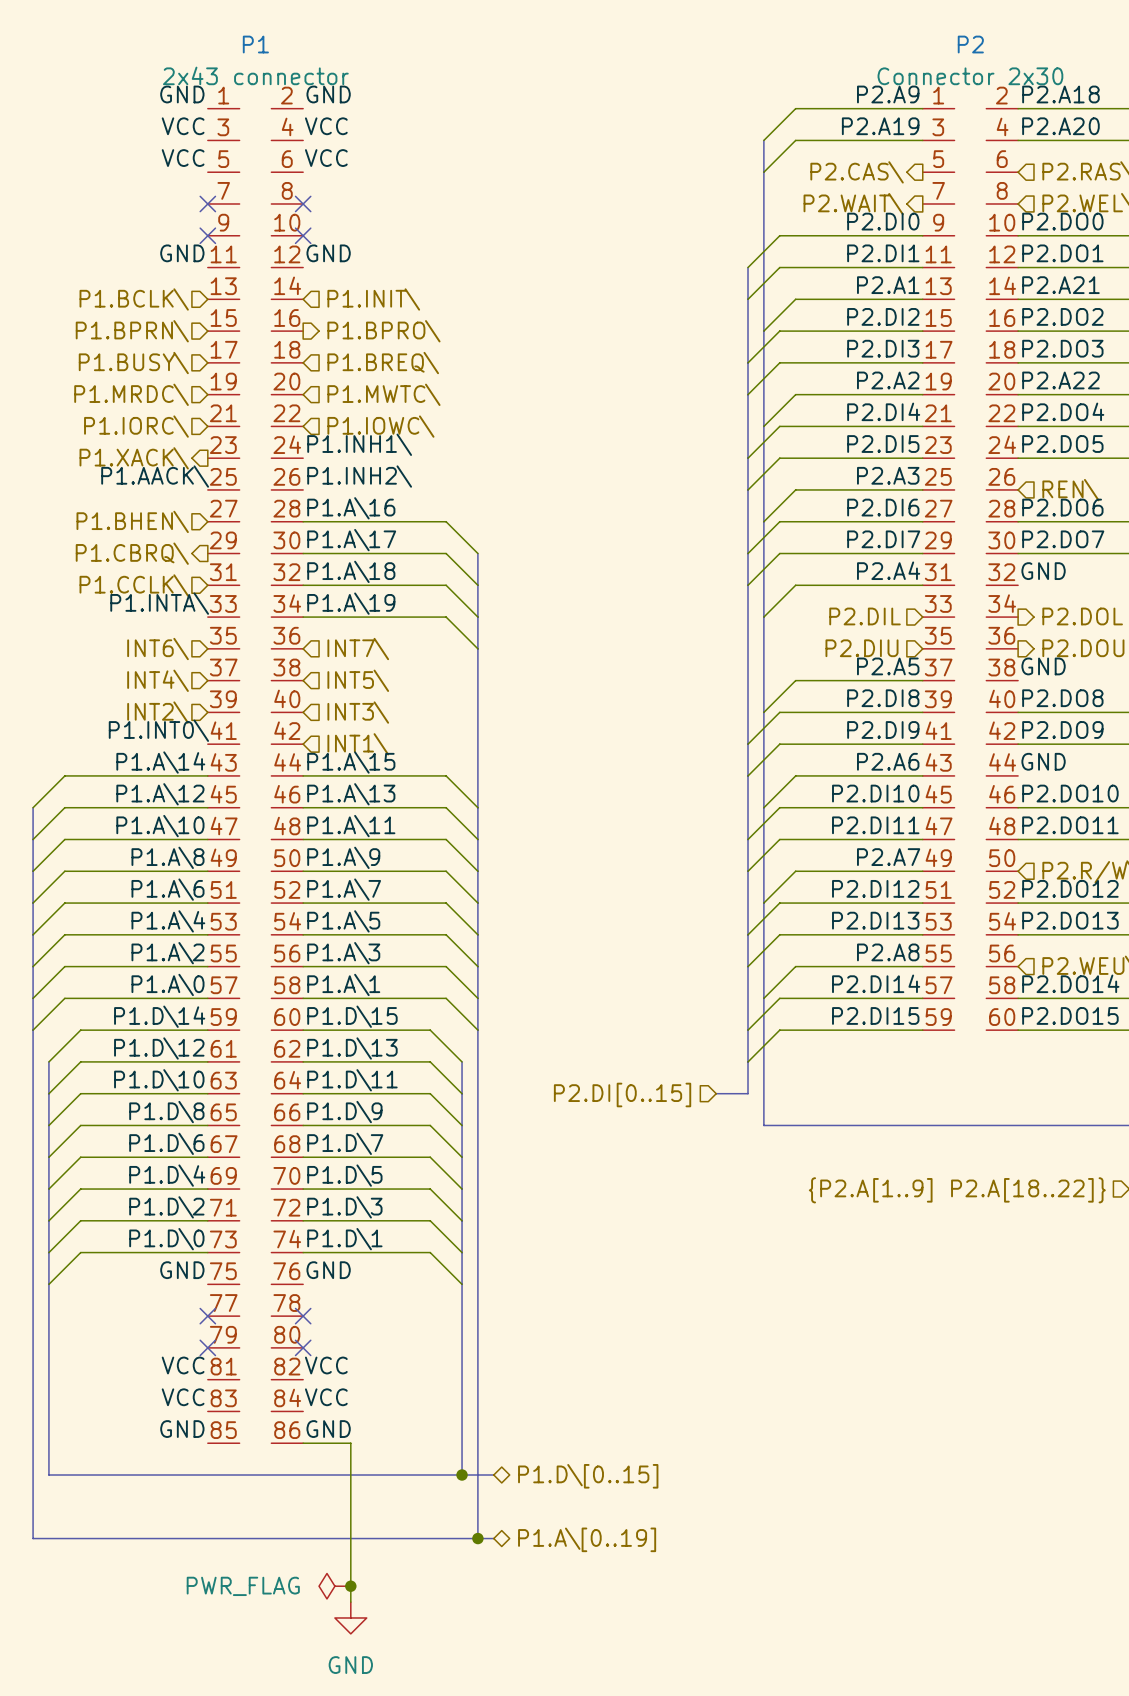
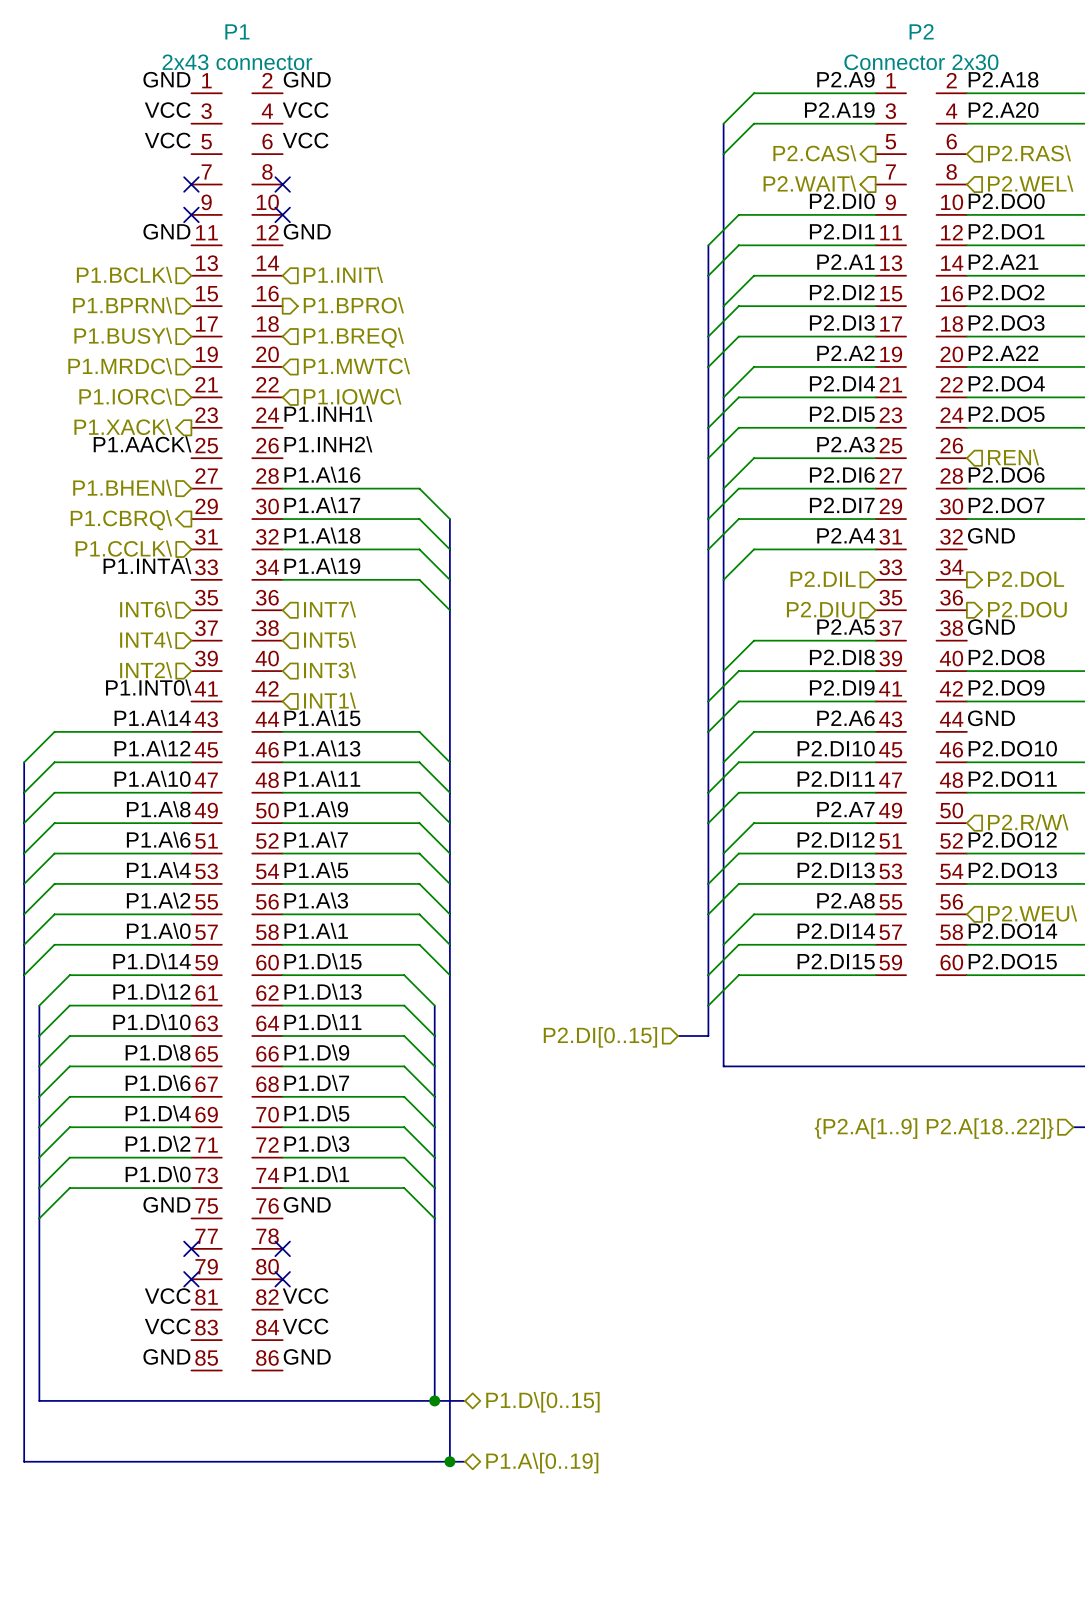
wire: (303, 1443) (350, 1443) (350, 1602) -> none
power symbol: PWR_FLAG (334, 1586) -> none
junction: (350, 1586) -> none
power symbol: GND (350, 1617) -> none

